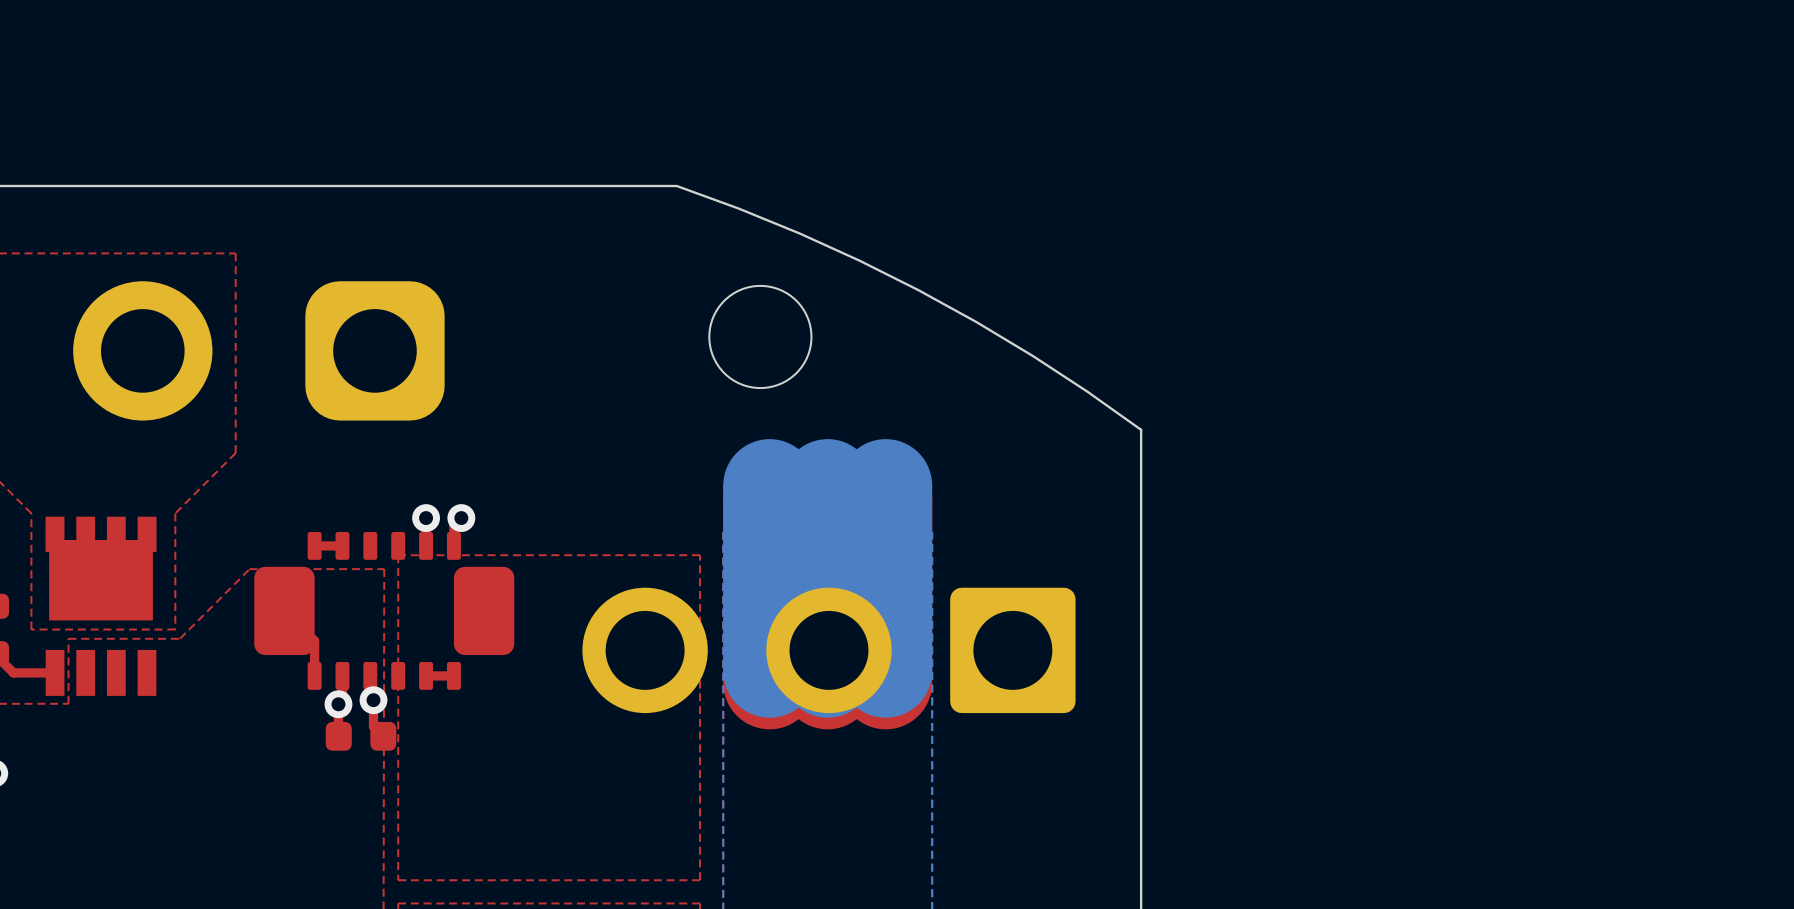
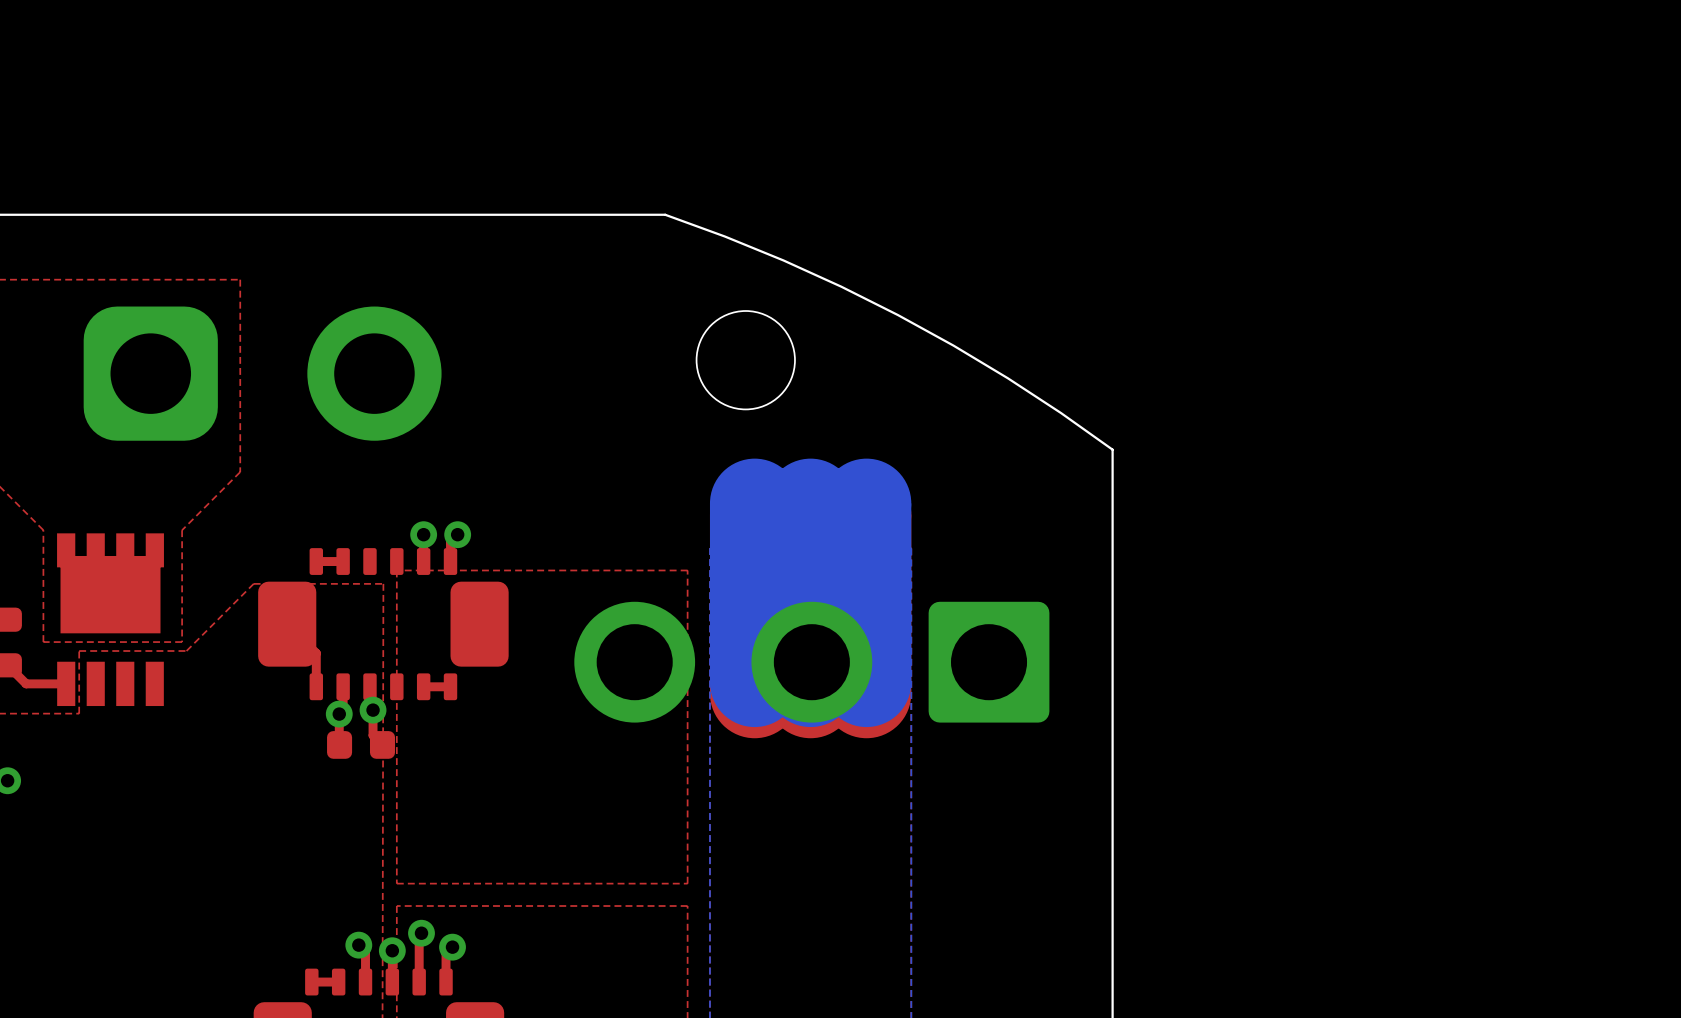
part rotation: 0° (258, 350) -> 180° (262, 373)

